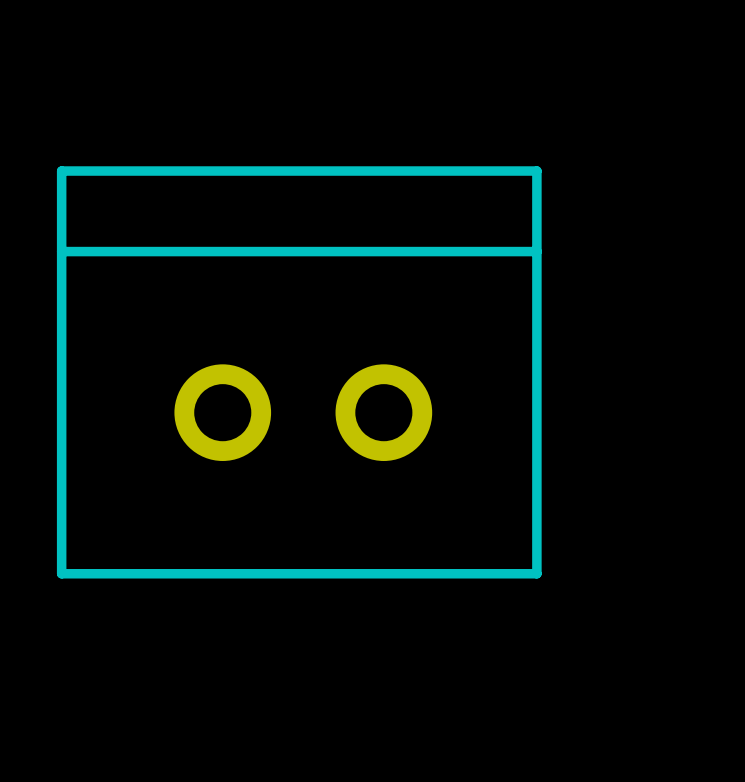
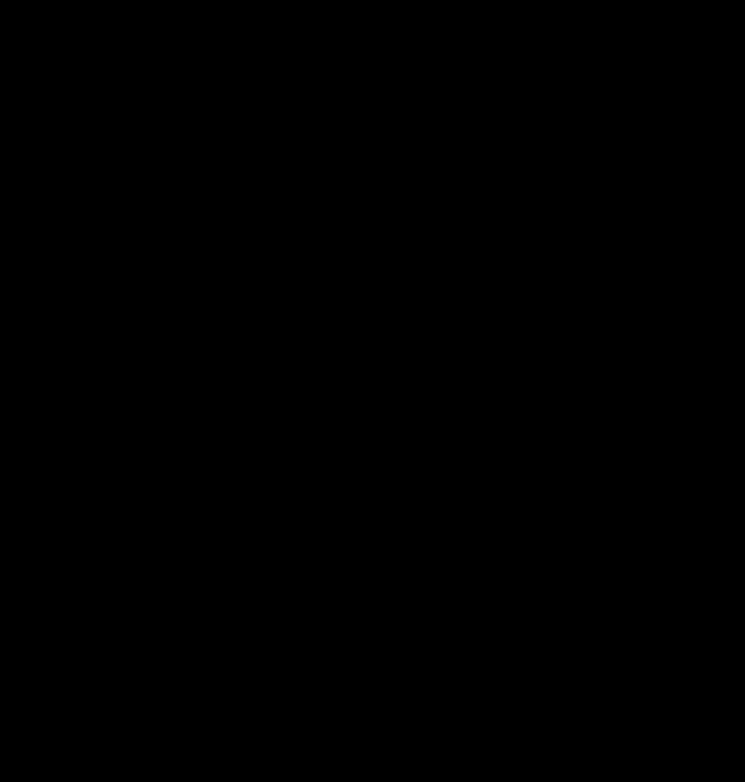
part: (299, 372) -> none

